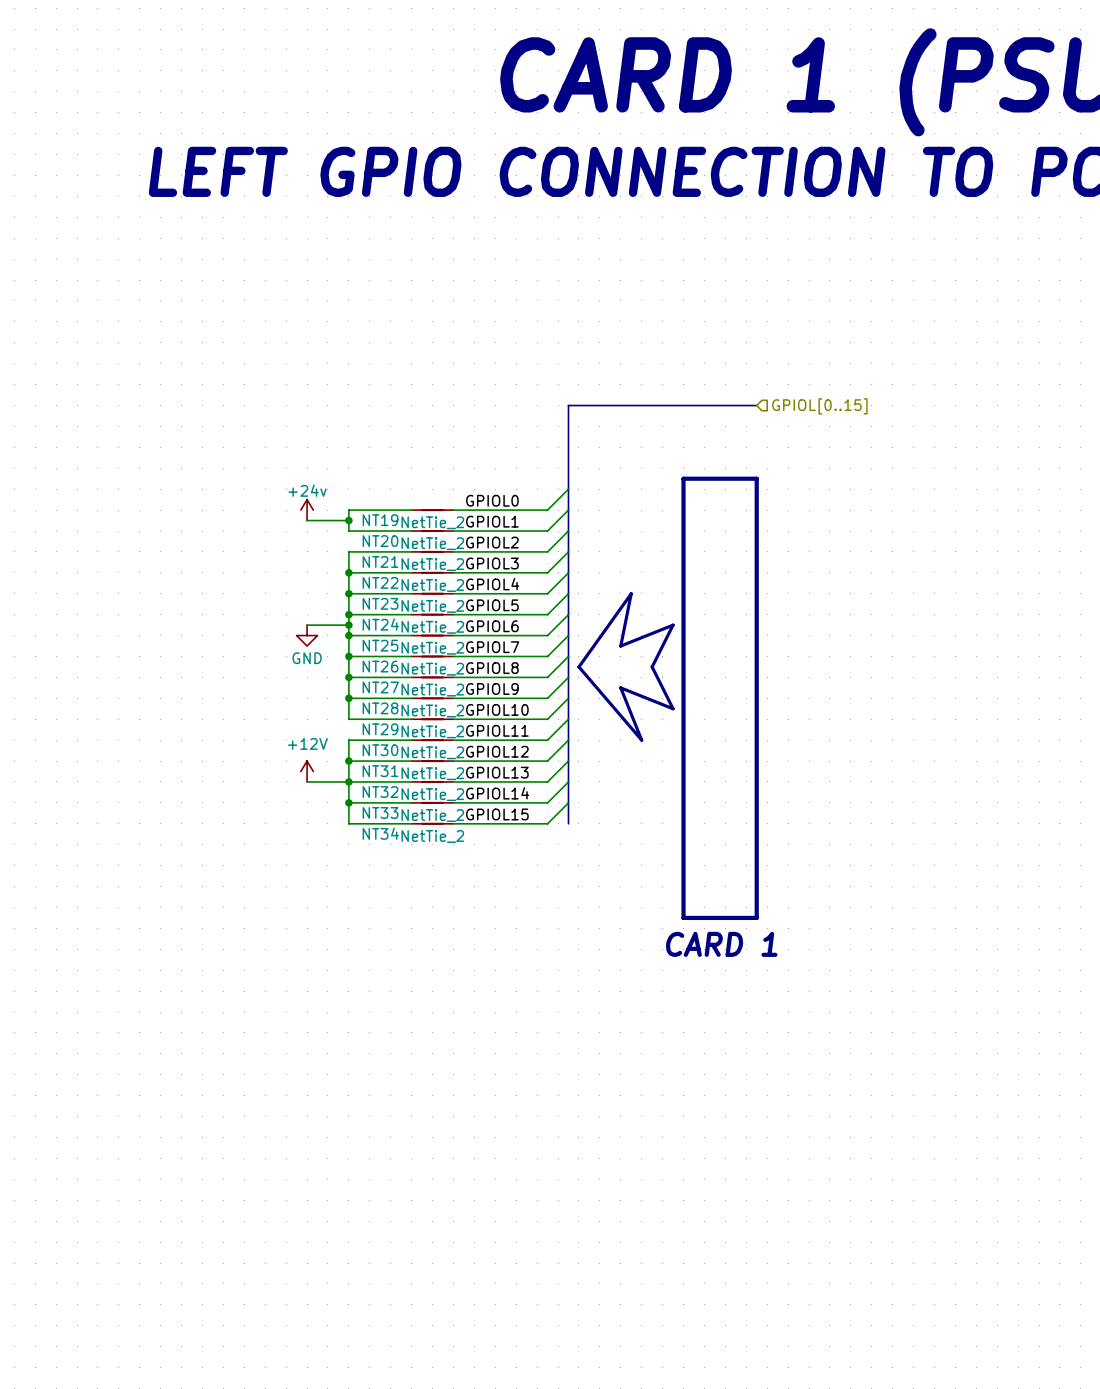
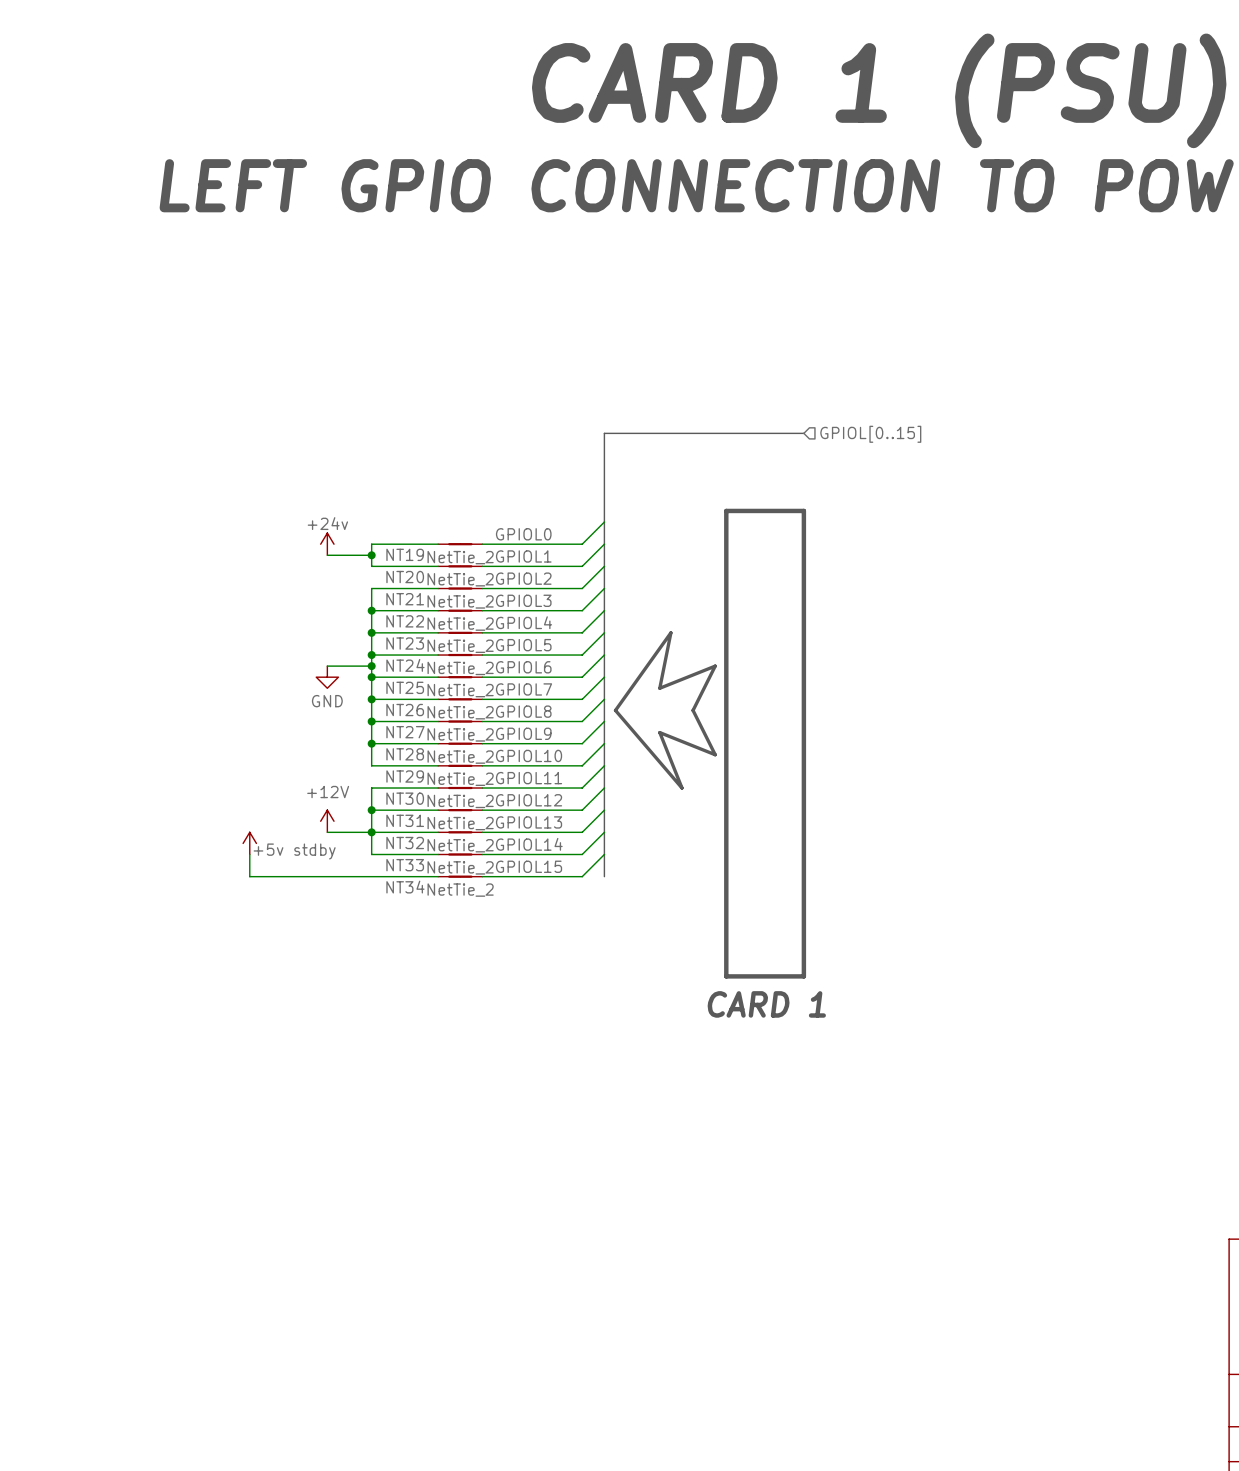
power symbol: none -> +5v stdby (249, 843)
wire: (348, 802) (348, 823) -> (249, 854) (249, 876) (371, 876)
junction: (348, 802) -> none

